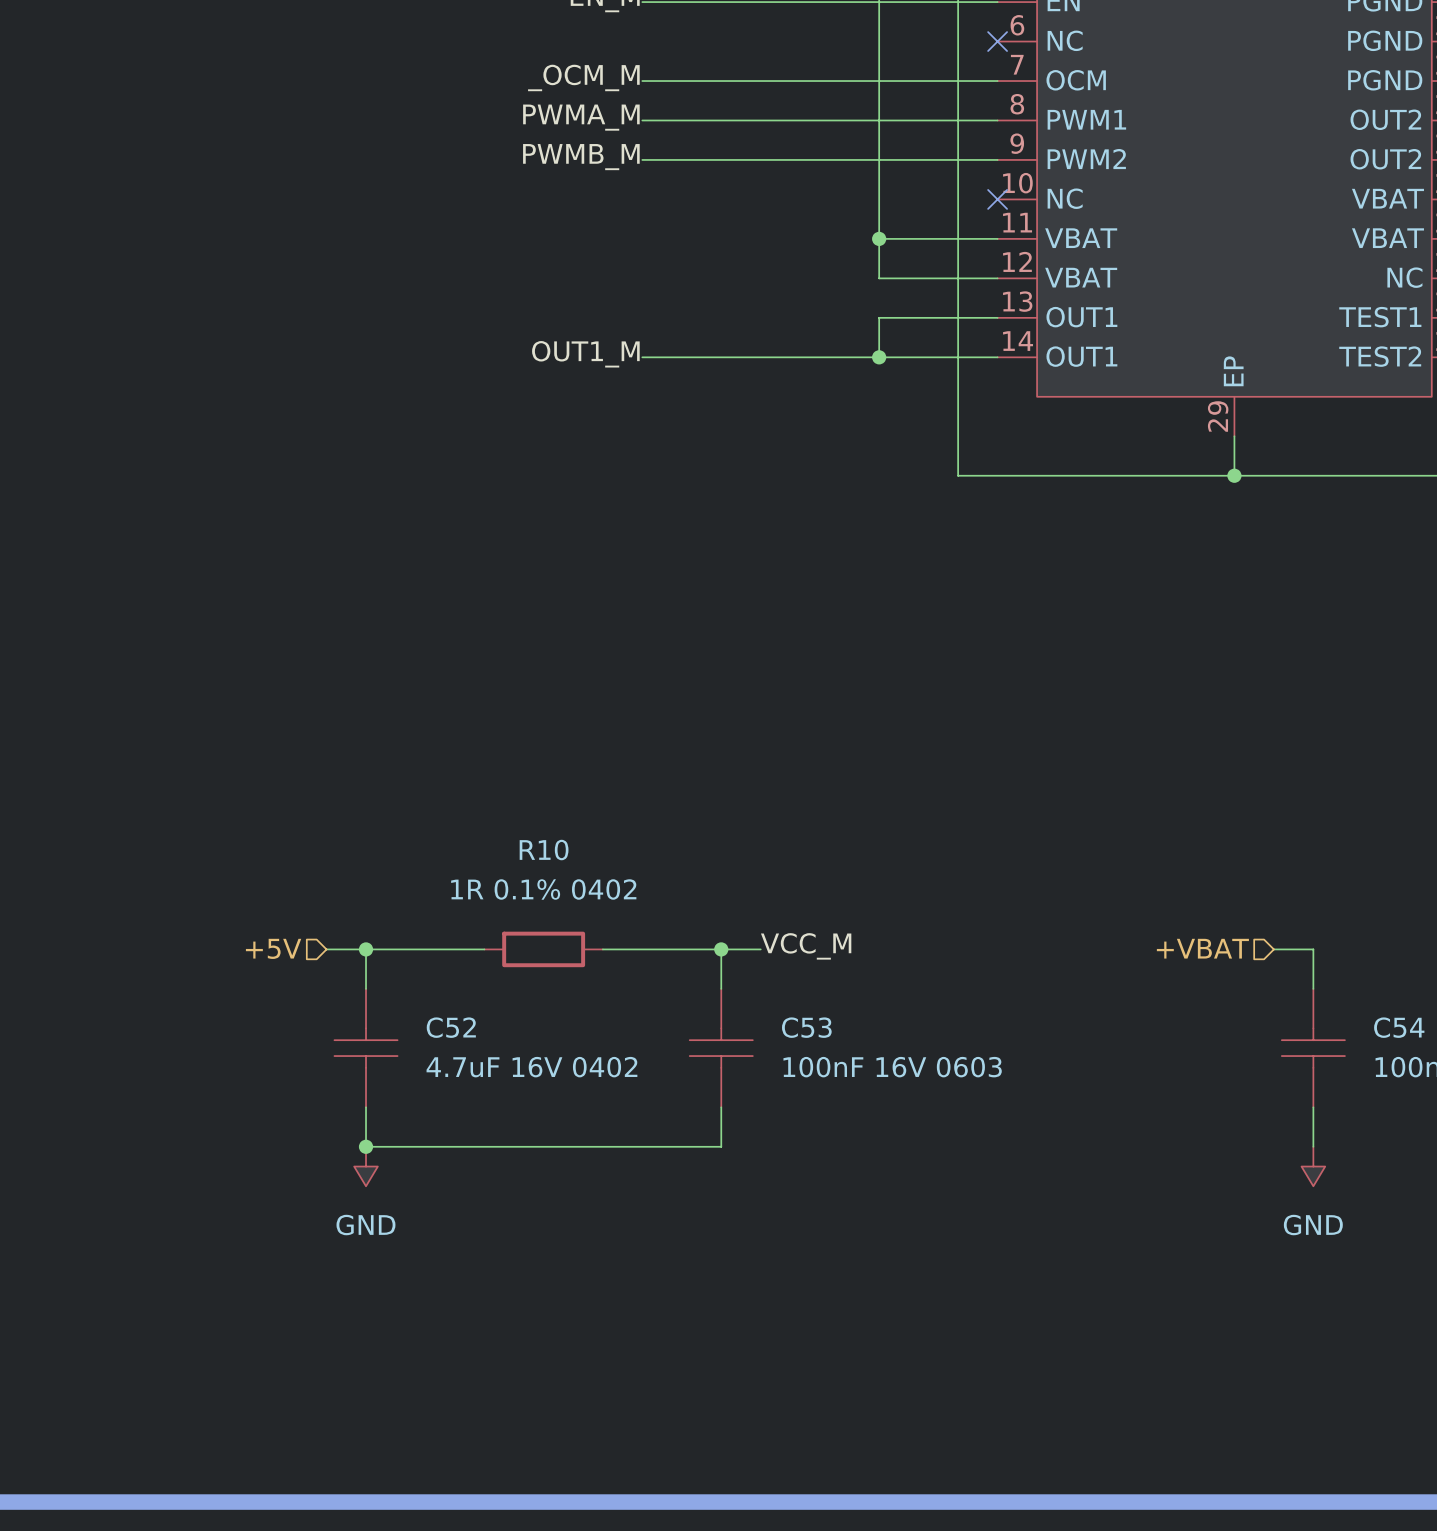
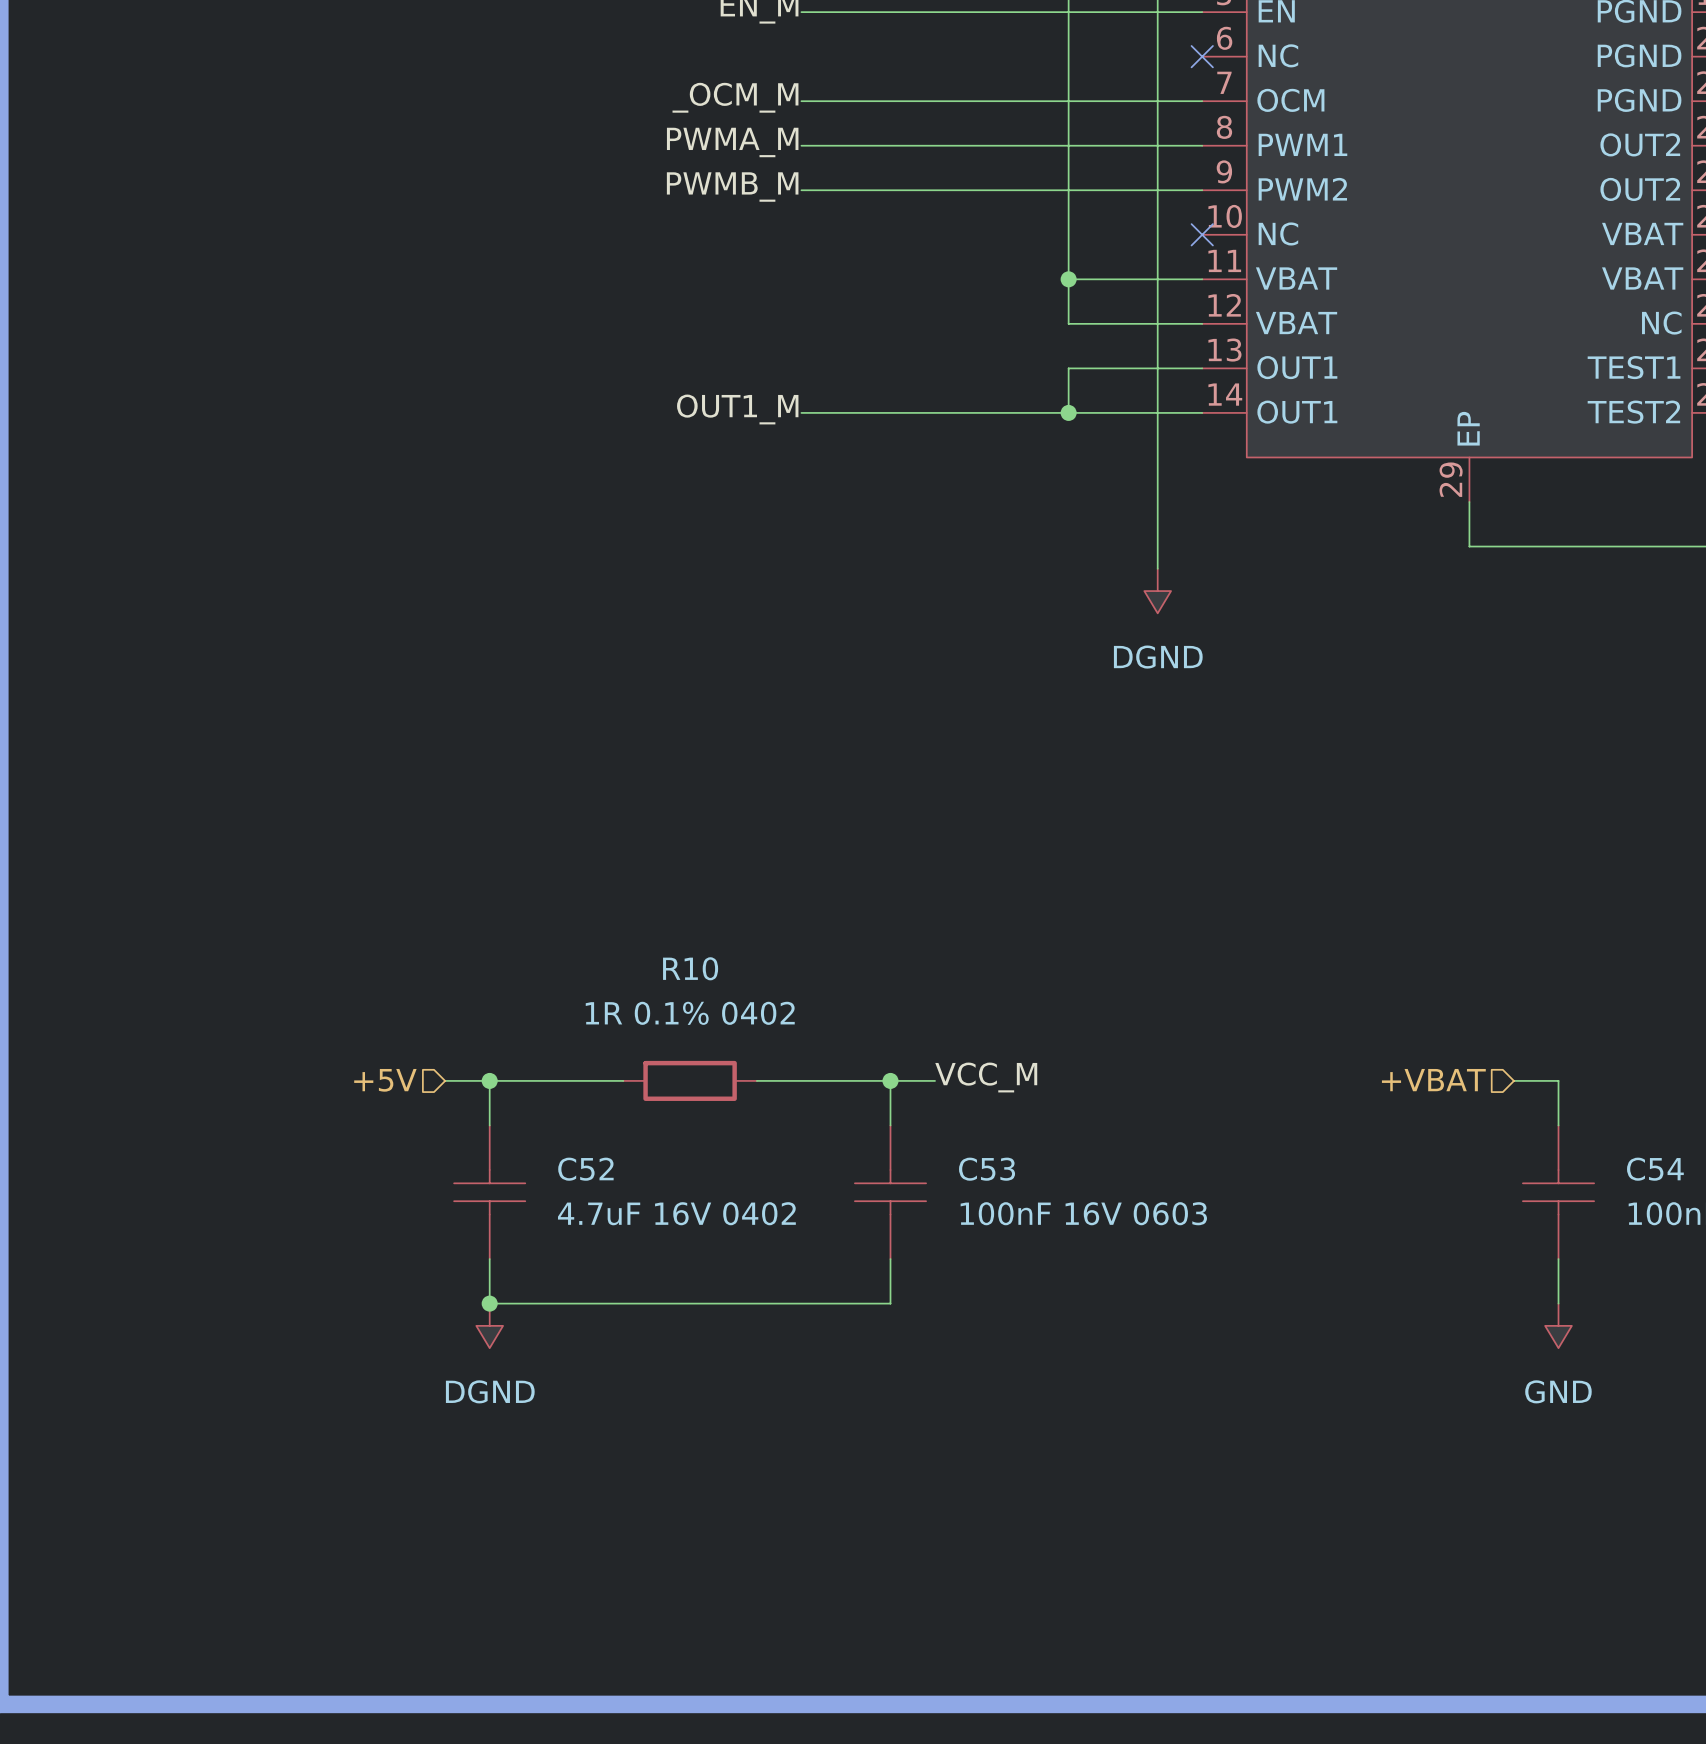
wire: (958, 475) (1234, 475) -> (1157, 546) (1157, 568)
junction: (1234, 475) -> none
power symbol: none -> DGND (1157, 591)
power symbol: GND (366, 1166) -> DGND (489, 1325)

